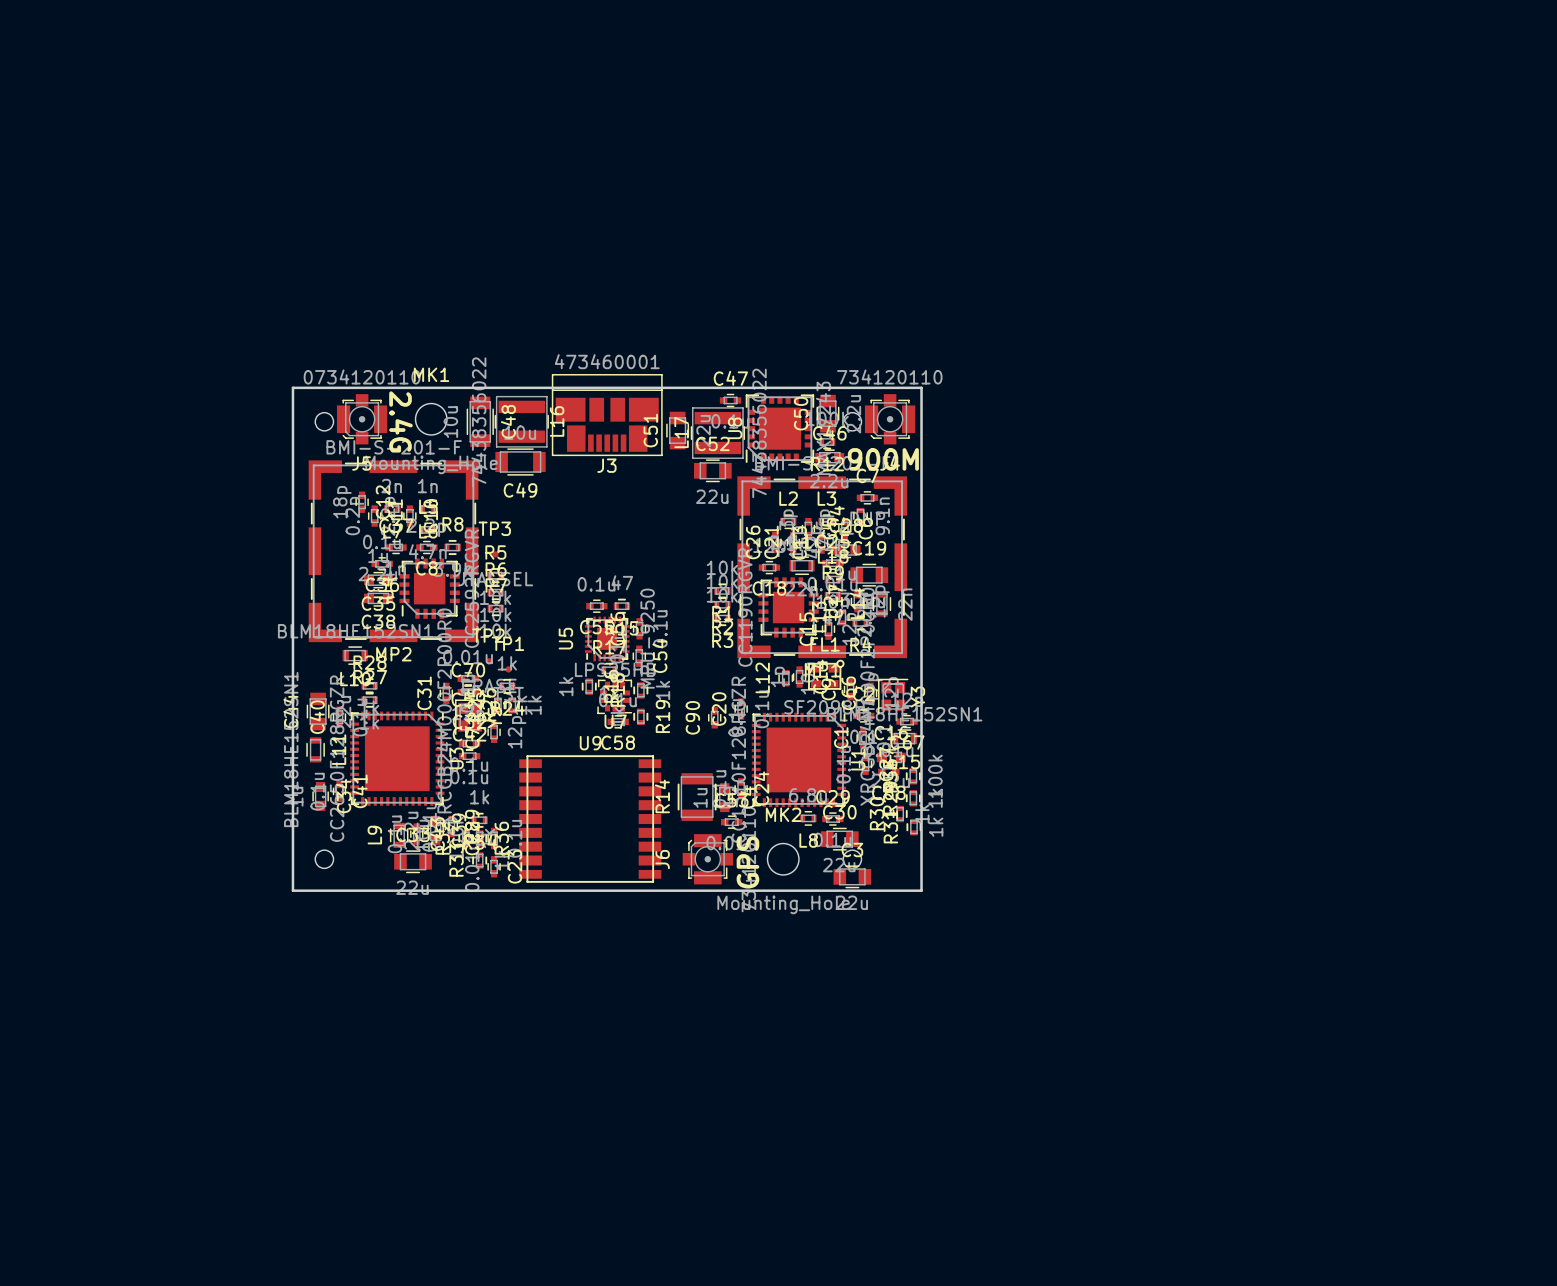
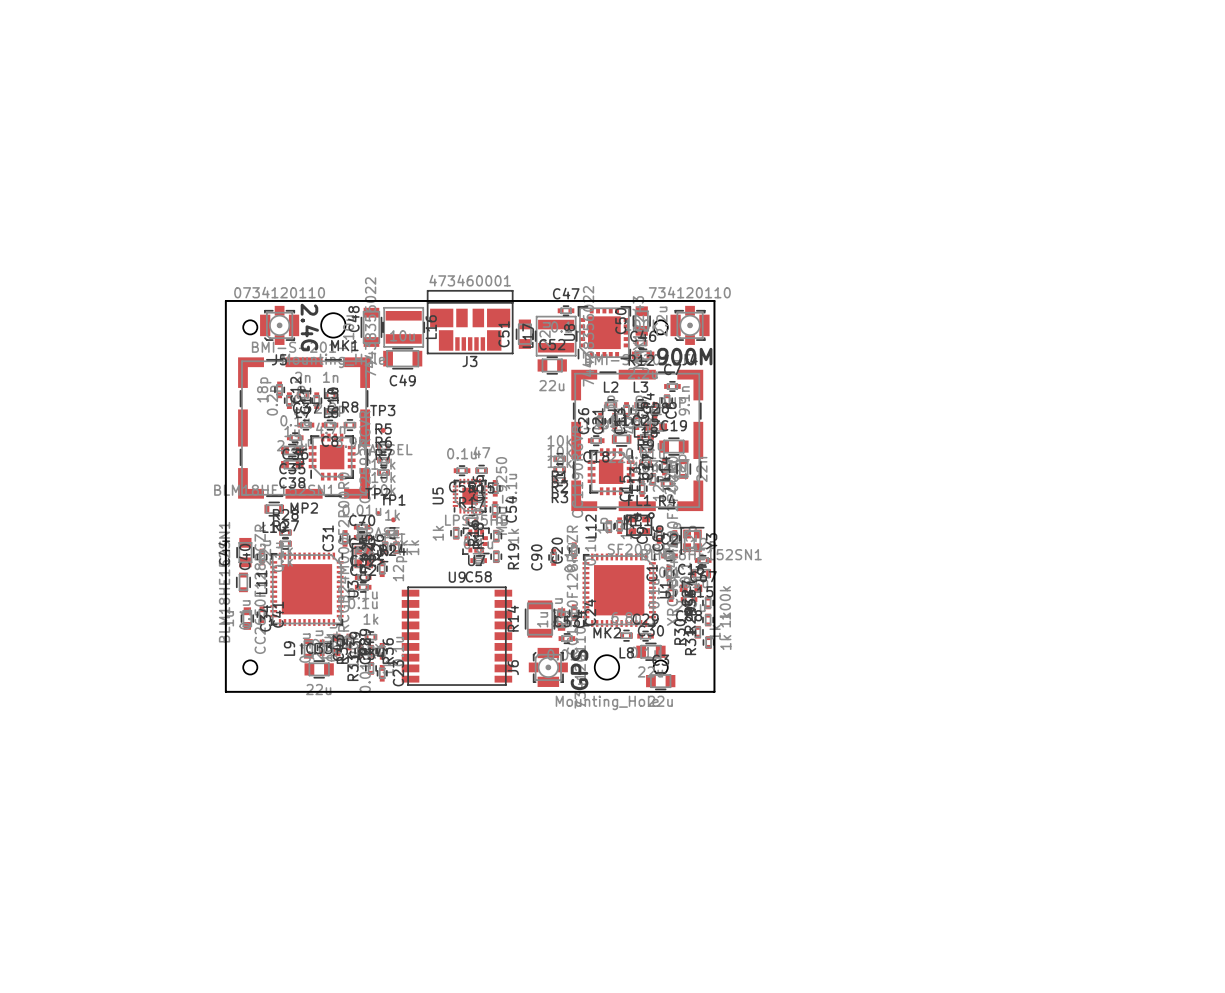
MK1 name position: MK1 (431, 374) -> MK1 (344, 345)
C48 name position: C48 (508, 421) -> C48 (353, 319)

